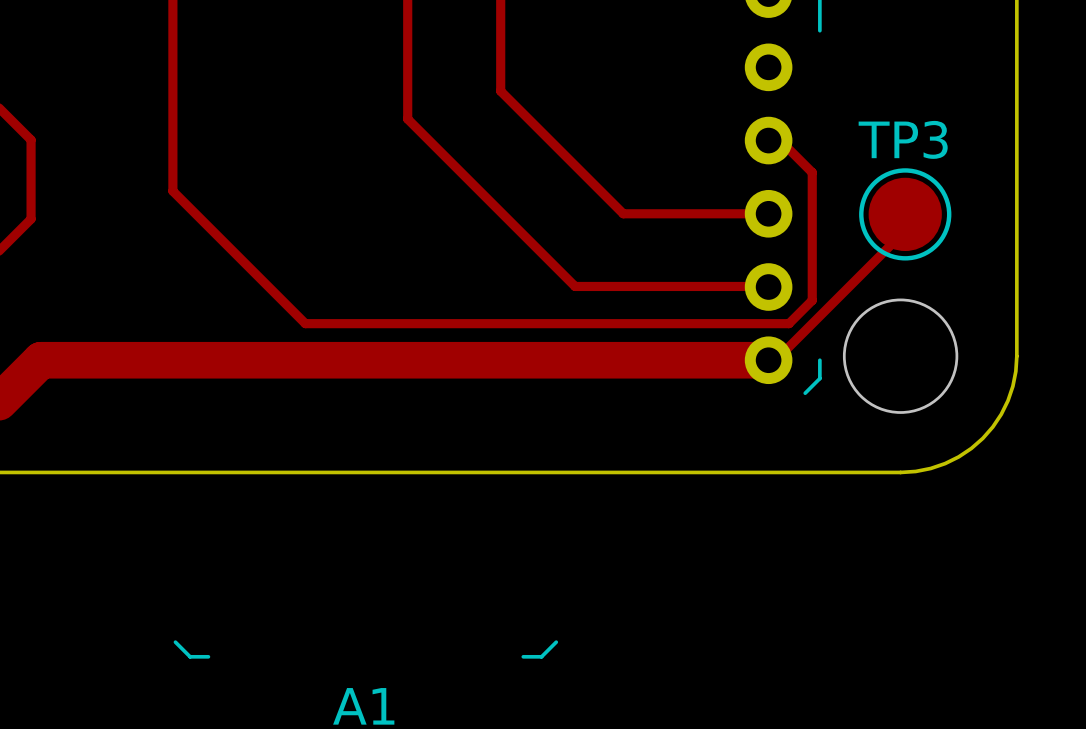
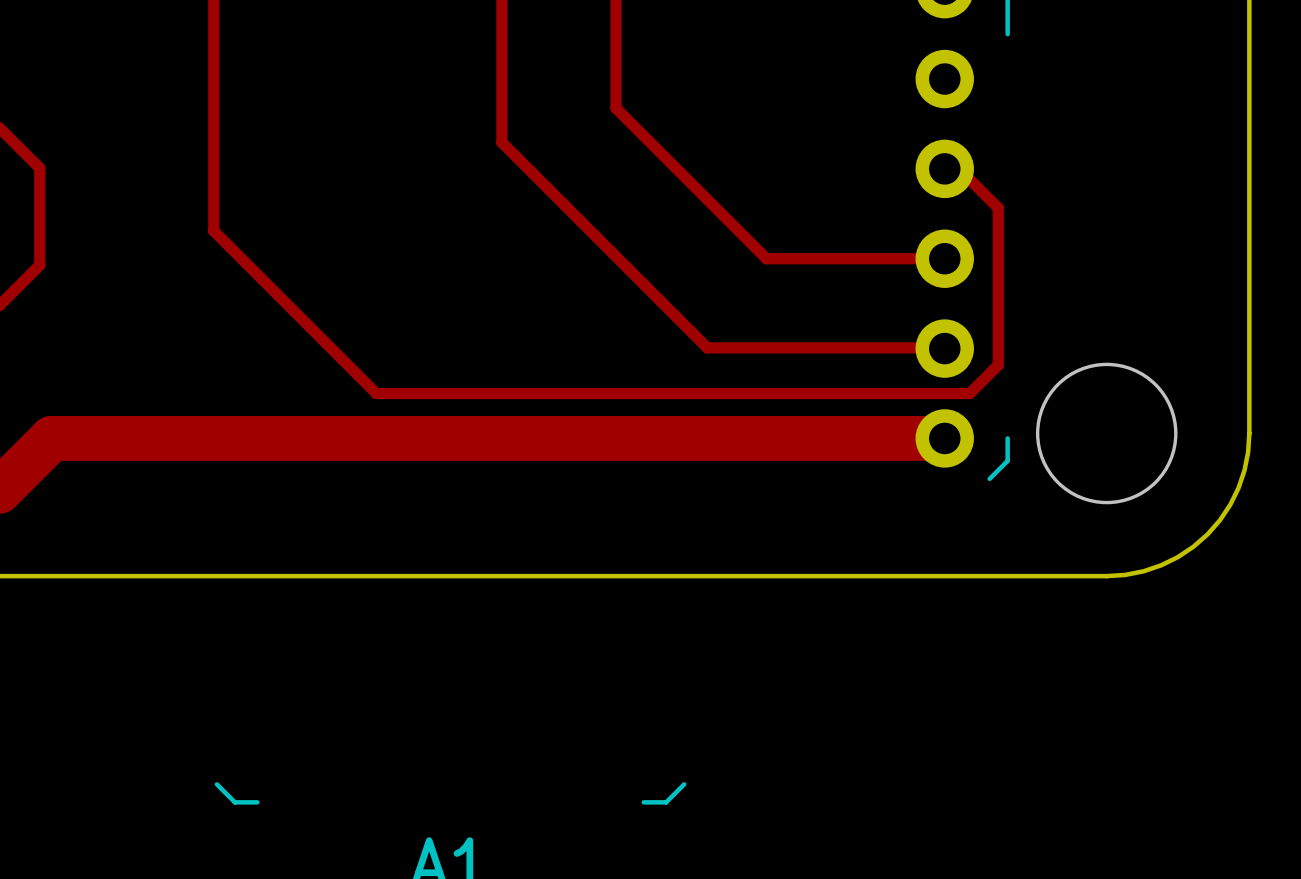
track: (905, 214) (905, 230) (775, 360) (768, 360) -> none
TP3: (905, 214) -> none

